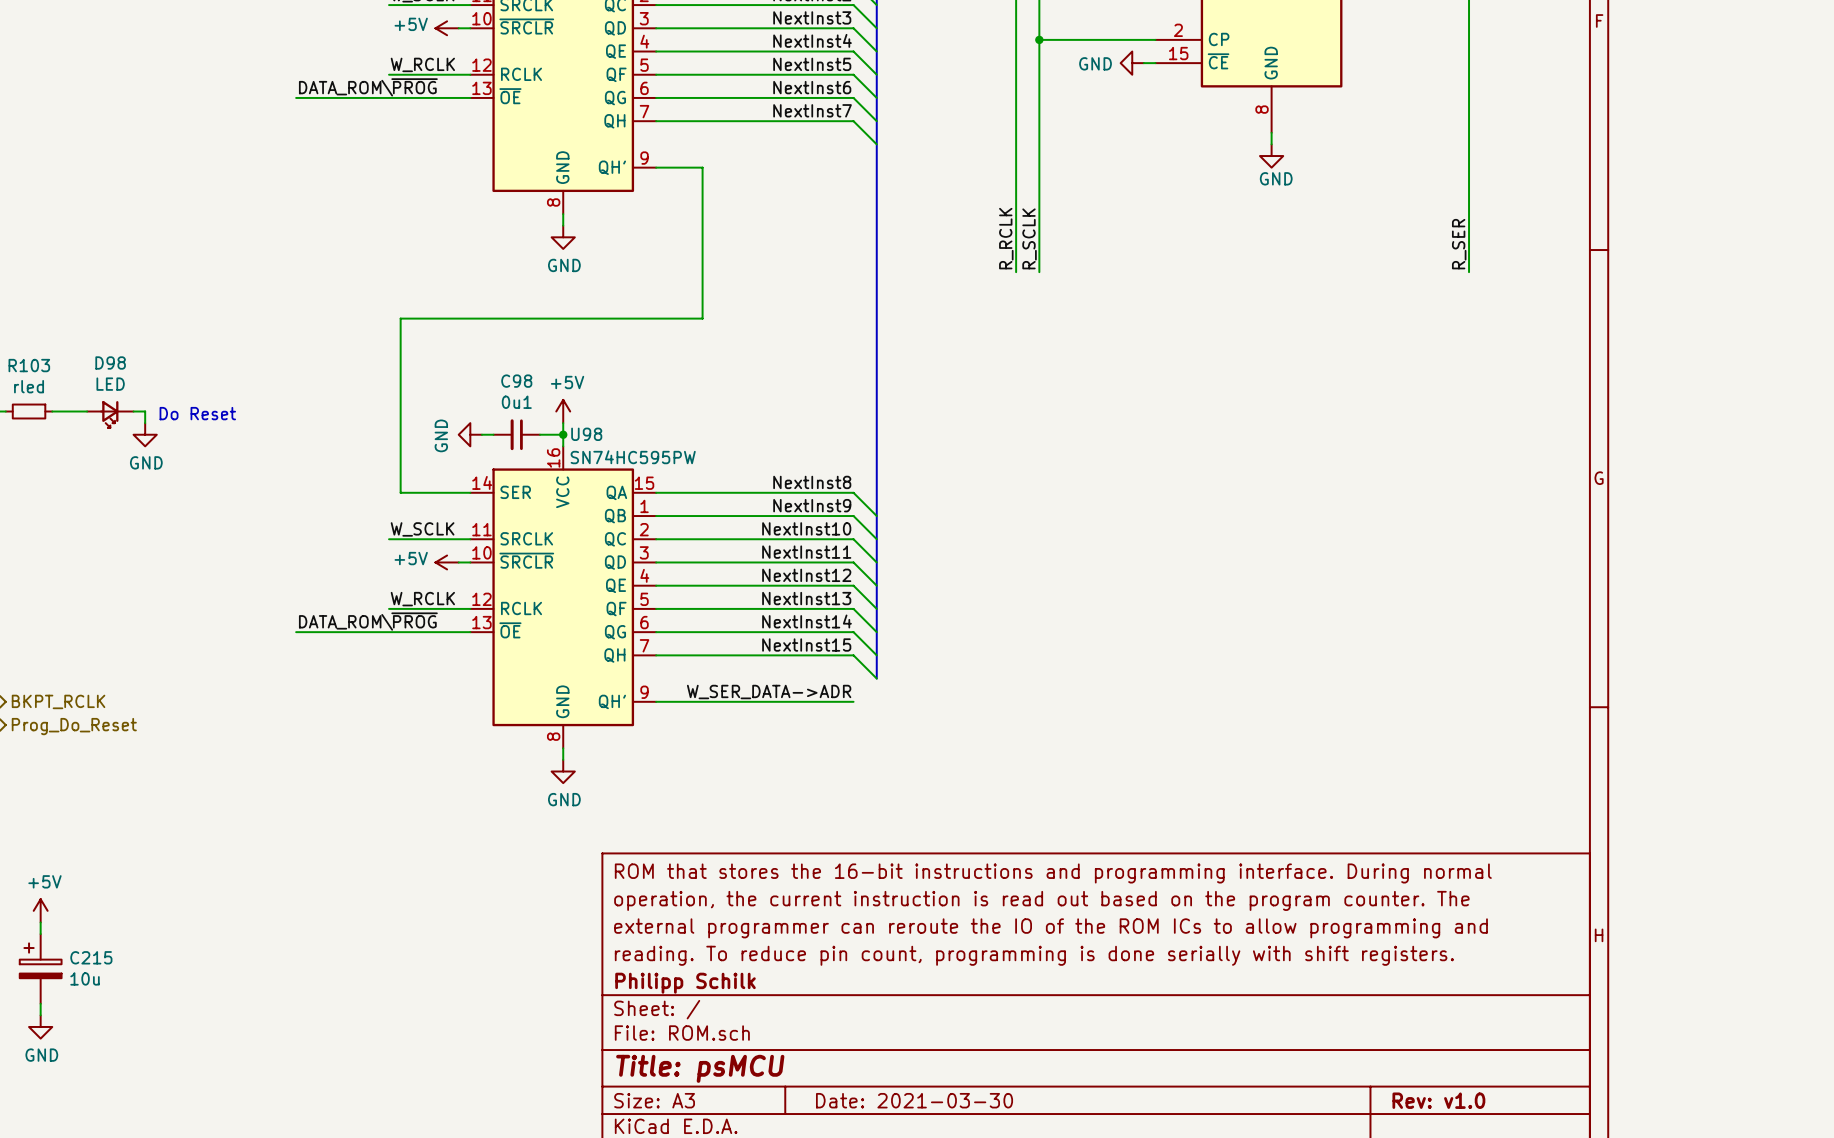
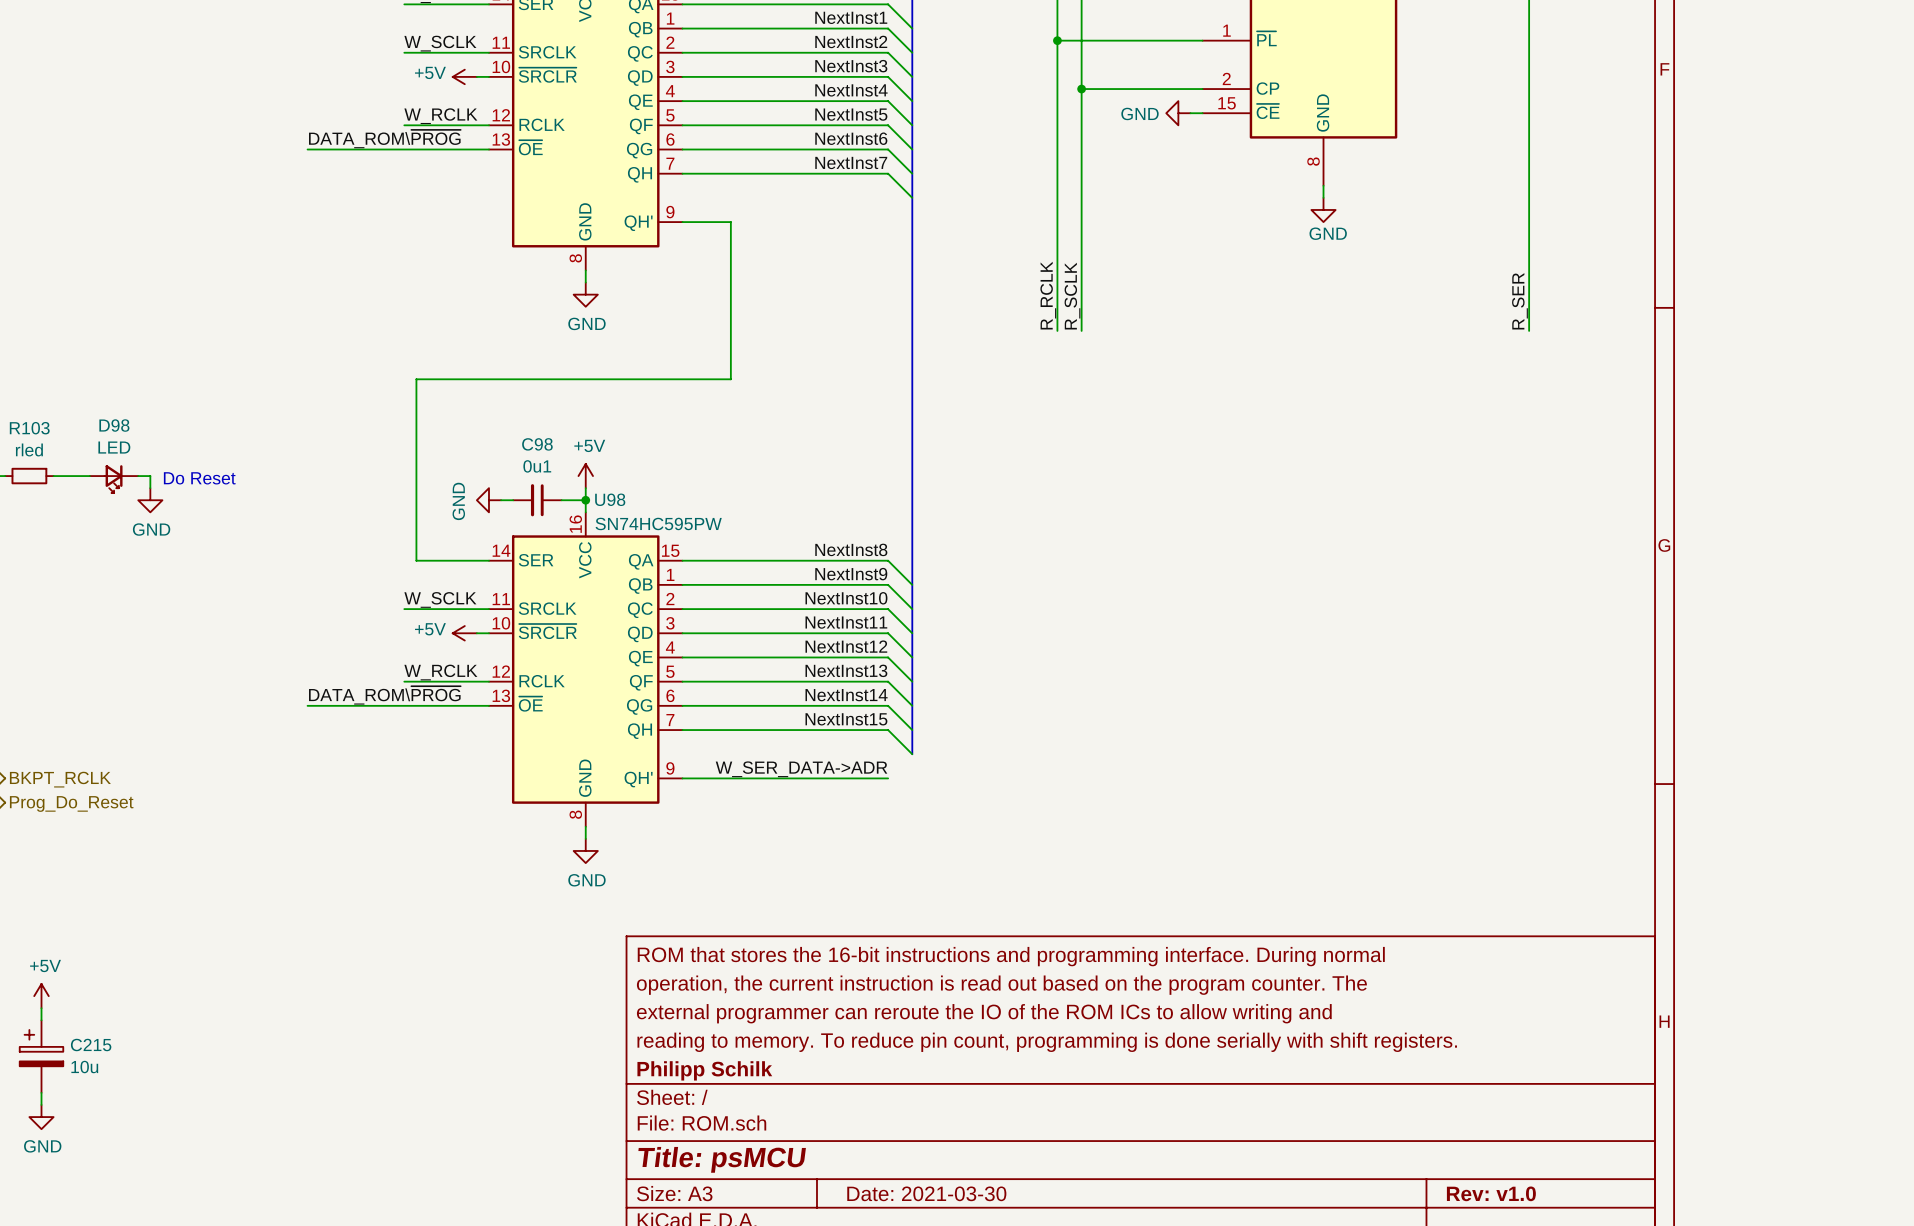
title block: external programmer can reroute the IO of the ROM ICs to allow programming and (1051, 928) -> external programmer can reroute the IO of the ROM ICs to allow writing and (984, 1013)
title block: reading. To reduce pin count, programming is done serially with shift registers. (1034, 955) -> reading to memory. To reduce pin count, programming is done serially with shift registers. (1047, 1042)

